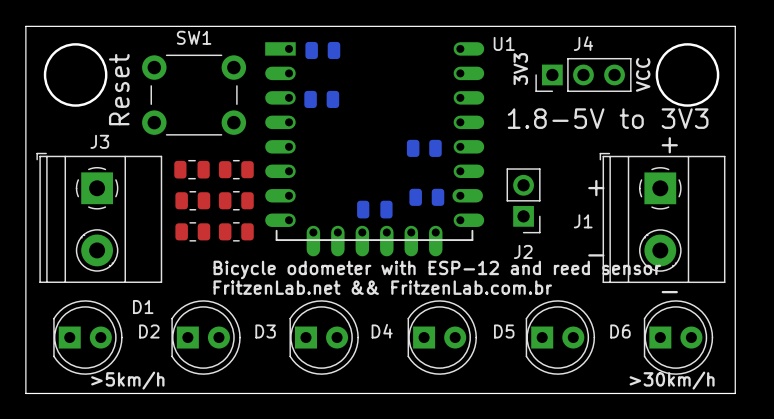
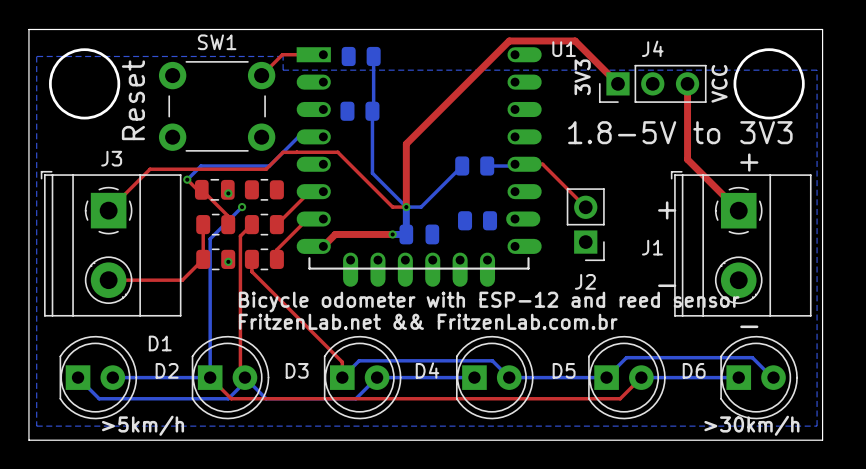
top track: none -> (323, 54) (282, 54) (261, 75)
bottom zone outline: none -> (36, 56) (283, 56) (283, 70) (817, 70) (817, 426) (36, 426) (36, 56)
bottom track: none -> (373, 56) (372, 173) (406, 207)
top track: none -> (617, 83) (575, 40) (509, 40) (406, 143) (406, 207) (392, 207) (337, 152) (283, 152) (266, 169) (150, 169) (108, 210)
top track: none -> (687, 83) (687, 159) (738, 210)
bottom track: none -> (323, 136) (298, 136) (269, 166) (200, 166) (187, 179)
top track: none -> (515, 164) (542, 164) (585, 207)
bottom track: none -> (515, 164) (513, 166) (487, 166)
bottom track: none -> (462, 166) (421, 207) (406, 207)
top track: none -> (187, 179) (197, 189) (201, 189) (228, 216) (228, 224)
via: none -> (187, 179)
top track: none -> (323, 191) (309, 191) (276, 224)
via: none -> (228, 193)
bottom track: none -> (242, 207) (210, 238) (210, 377) (112, 377)
via: none -> (242, 207)
bottom track: none -> (406, 207) (406, 234) (392, 234)
via: none -> (406, 207)
top track: none -> (323, 219) (307, 219) (276, 249) (276, 259)
top track: none -> (203, 224) (203, 259) (182, 280) (108, 280)
top track: none -> (251, 224) (240, 236) (240, 373) (244, 377)
top track: none -> (392, 234) (335, 234) (323, 246) (320, 243)
via: none -> (392, 234)
top track: none -> (251, 259) (251, 271) (342, 362) (342, 377)
via: none -> (228, 261)
bottom track: none -> (78, 377) (99, 398) (228, 398) (244, 382) (244, 377) (266, 398) (355, 398) (377, 377) (474, 377)
top track: none -> (210, 377) (231, 398) (620, 398) (641, 377)
bottom track: none -> (342, 377) (359, 360) (492, 360) (509, 377) (606, 377) (626, 357) (752, 357) (773, 377)
bottom track: none -> (641, 377) (738, 377)

